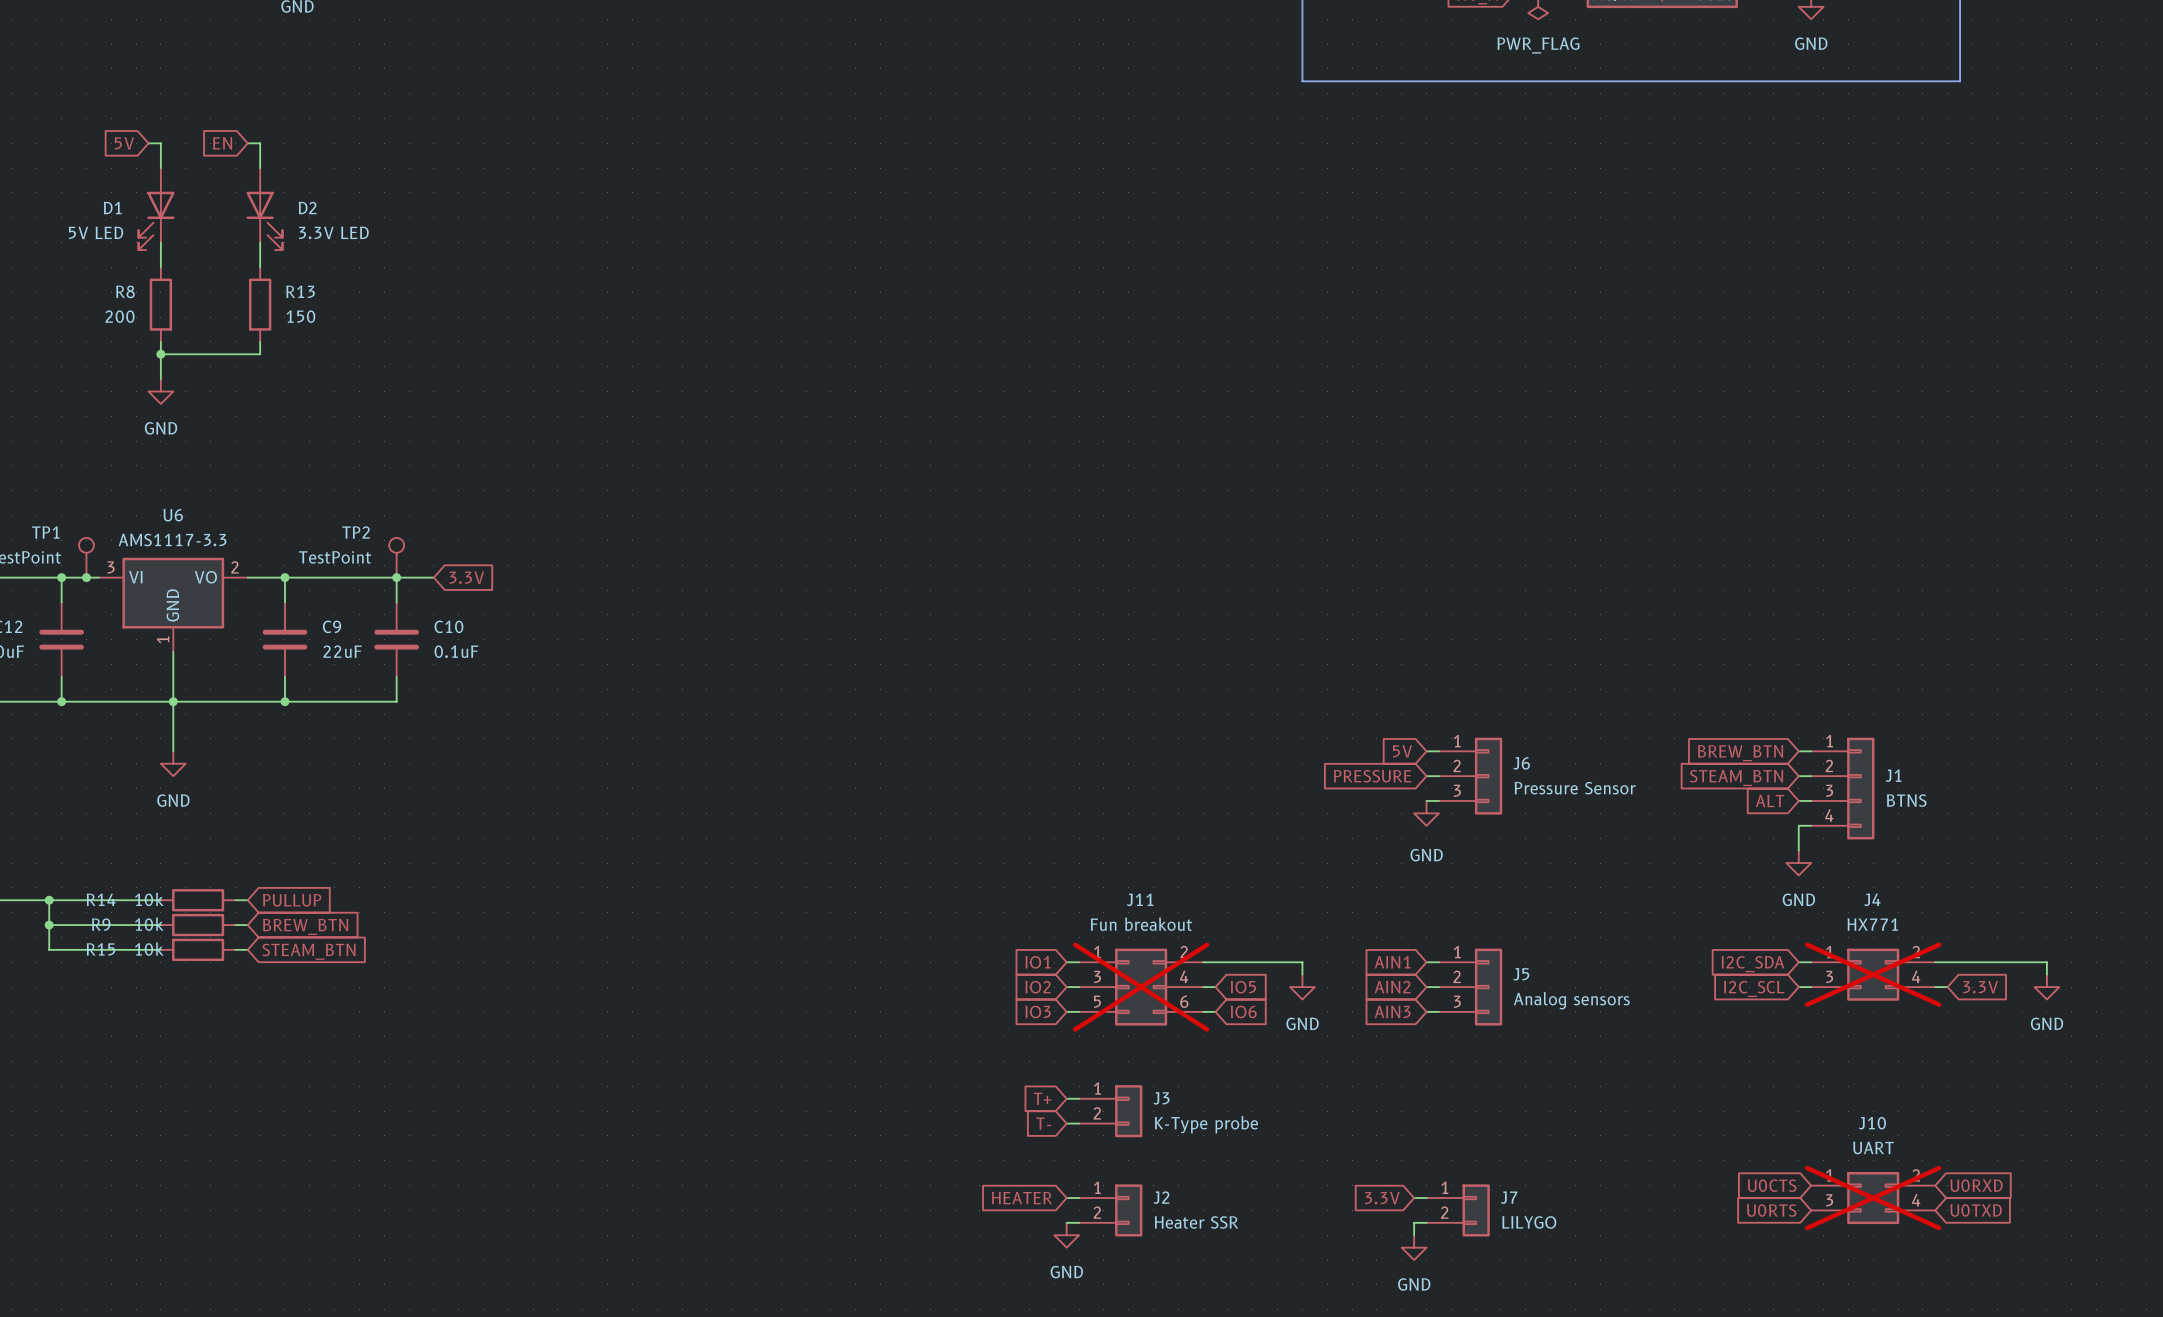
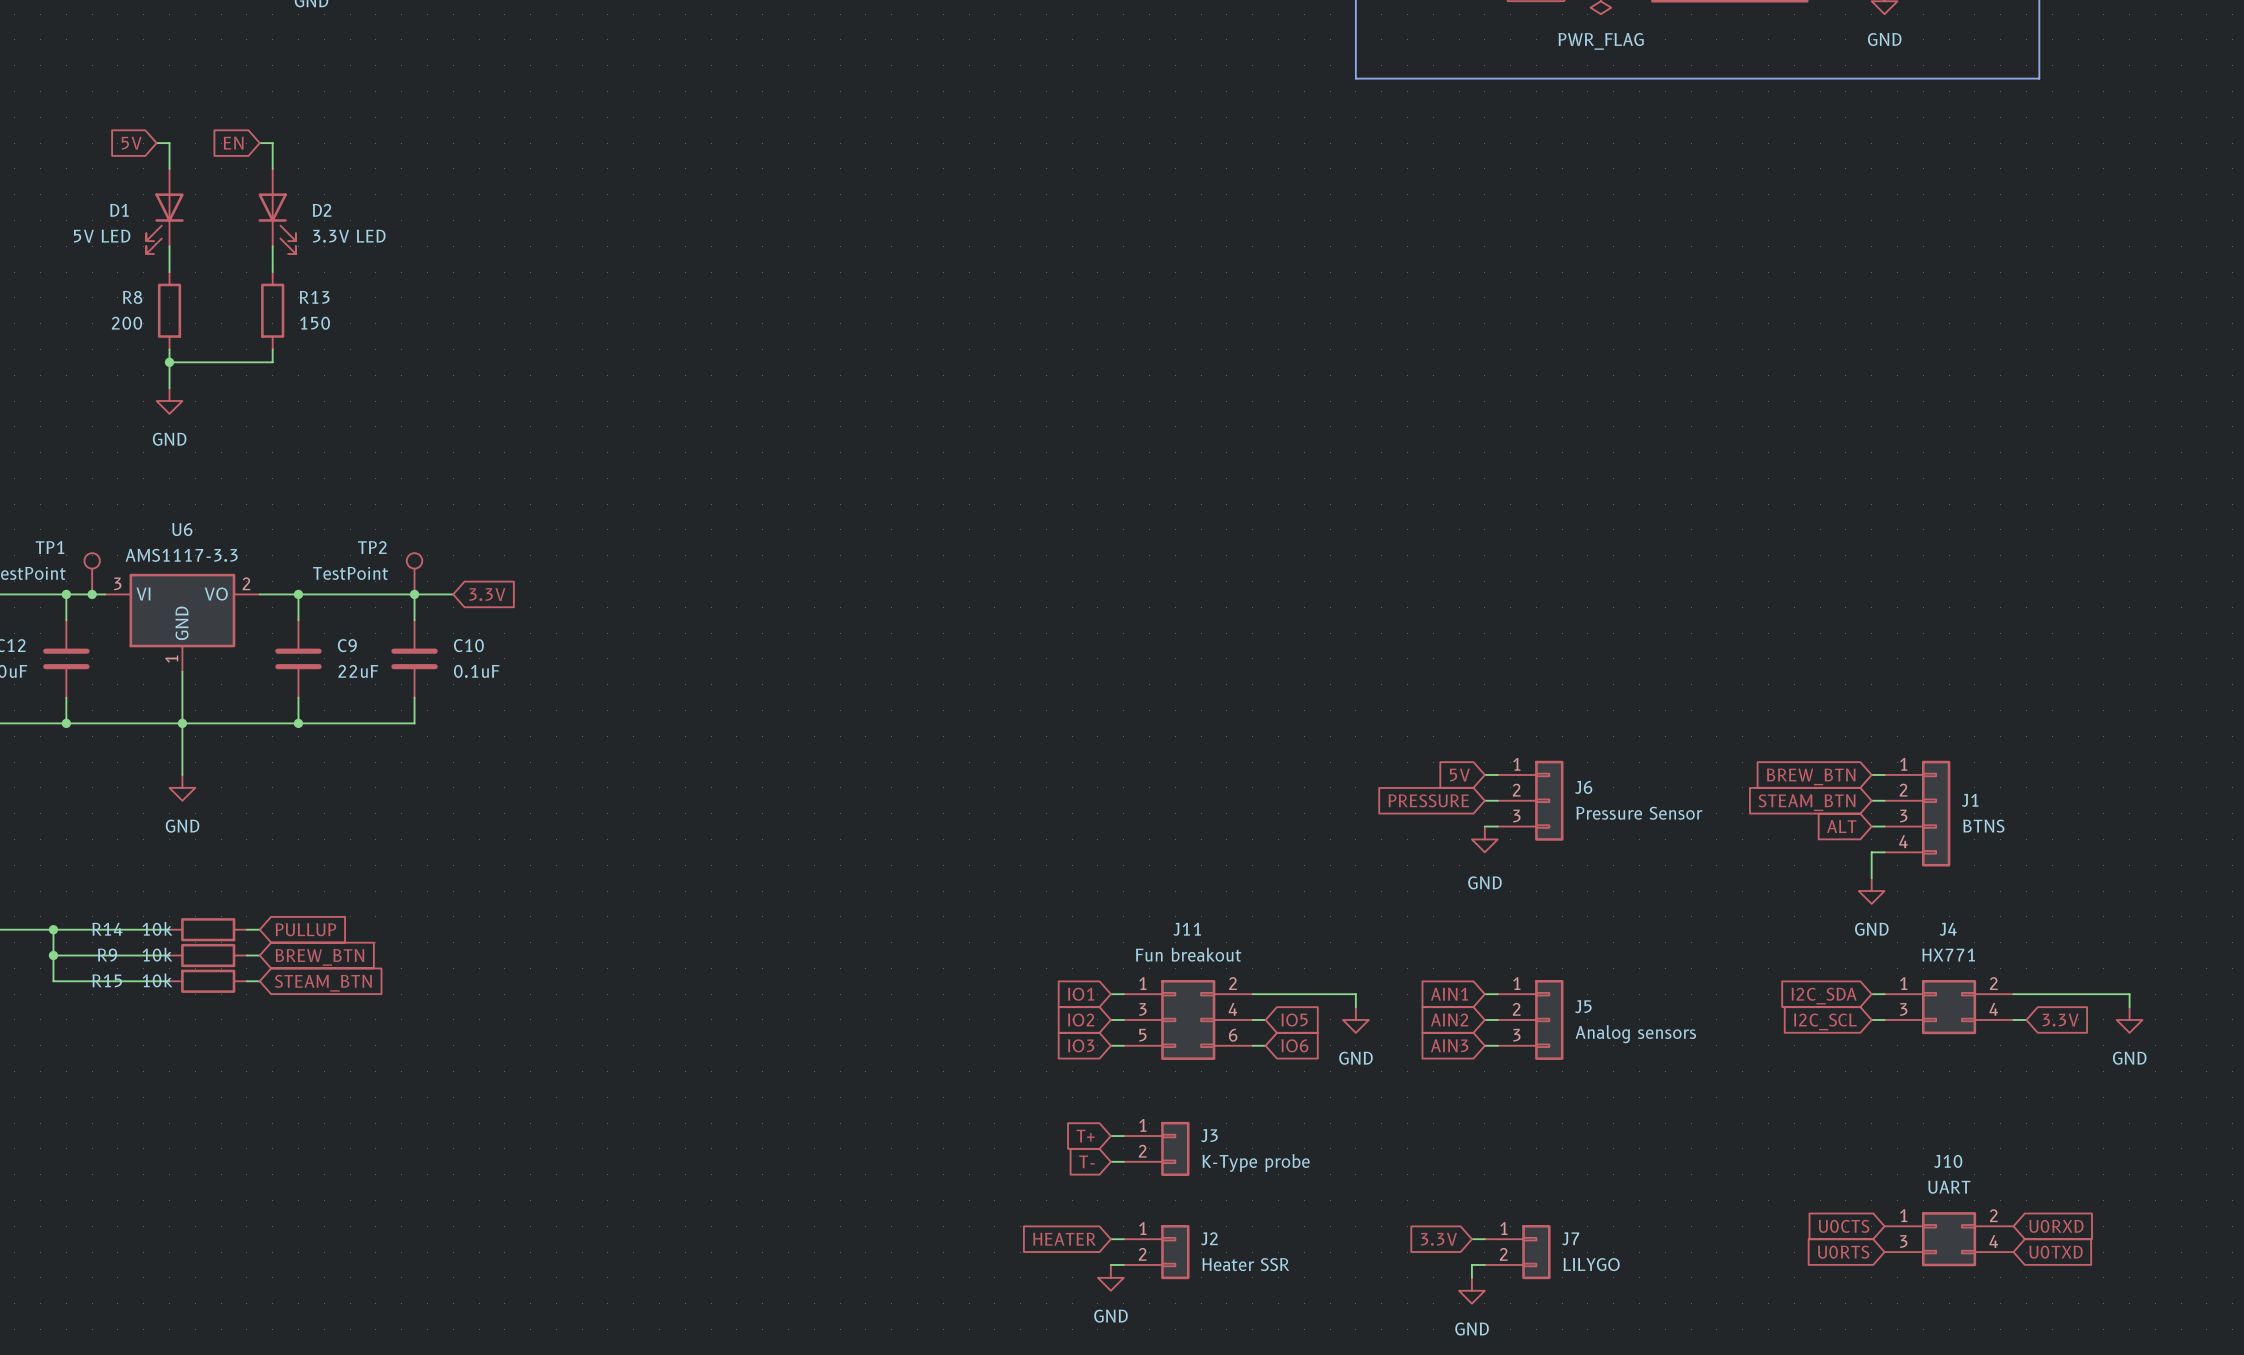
J4 do-not-place cross: (1873, 974) -> none
J11 do-not-place cross: (1141, 987) -> none
J10 do-not-place cross: (1873, 1198) -> none

